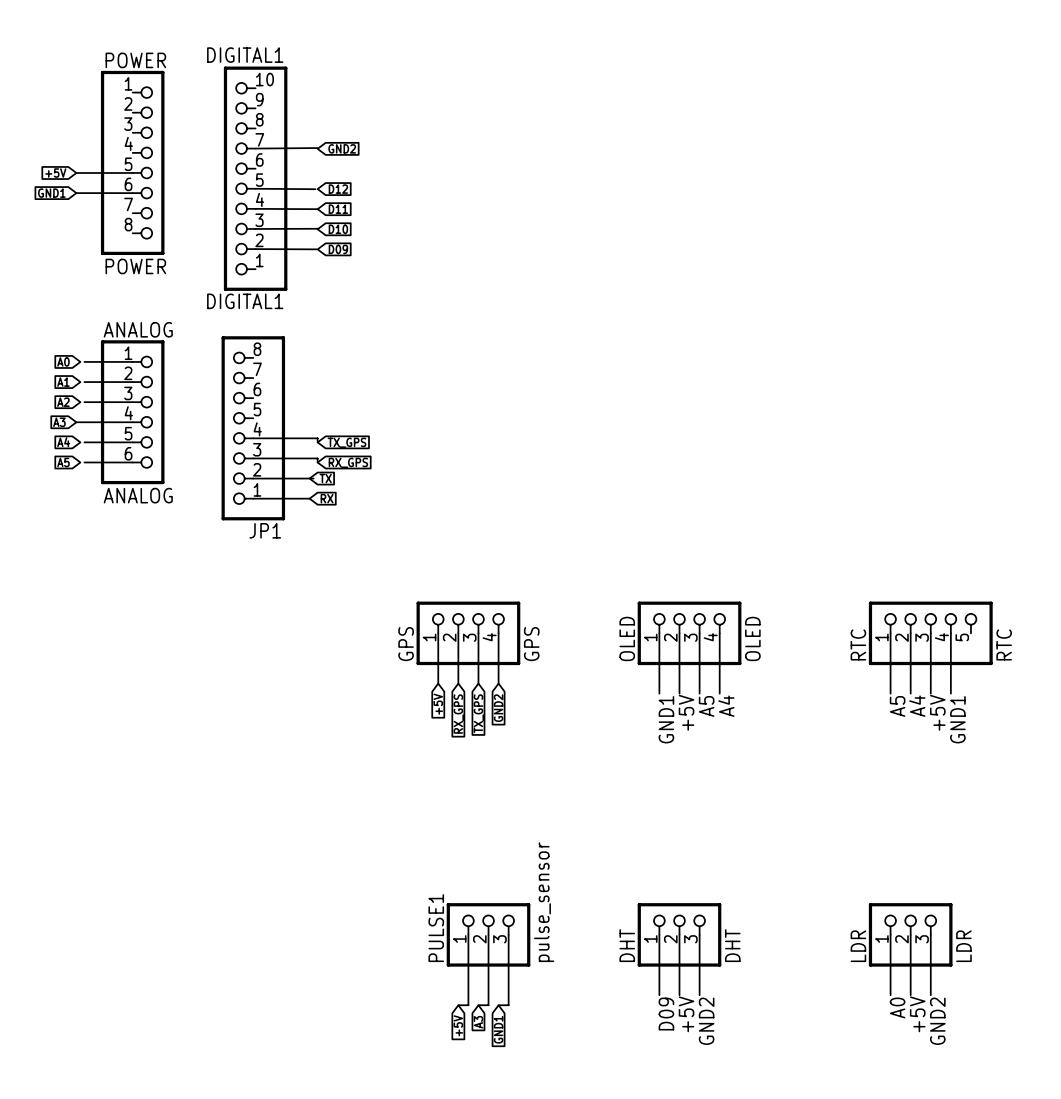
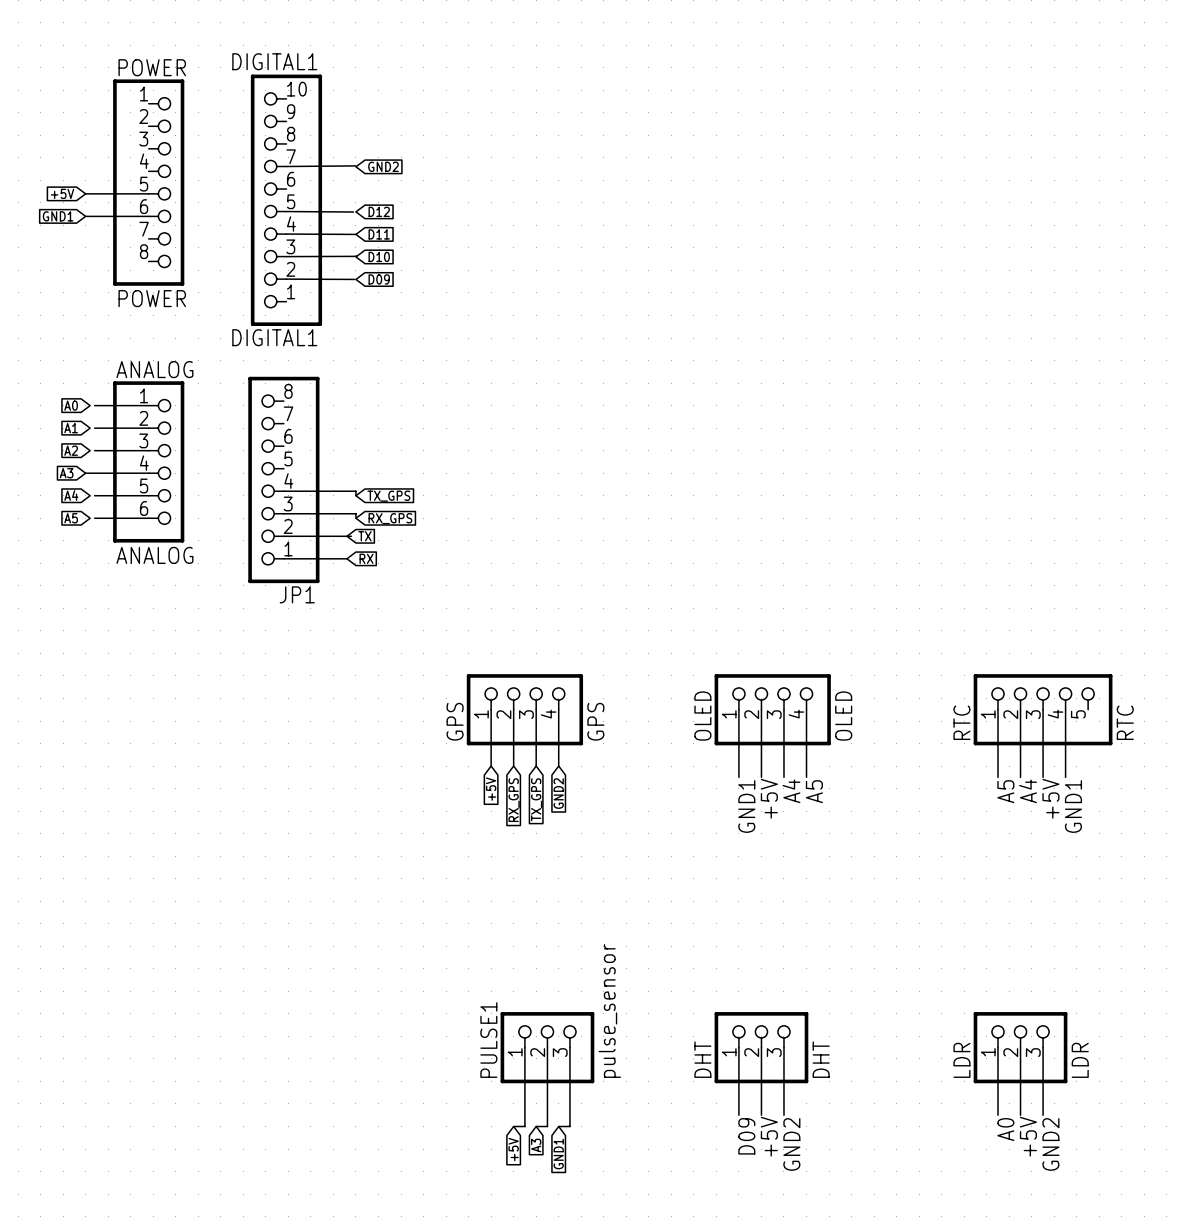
label: A5 (706, 706) -> A4 (791, 791)
label: A4 (726, 706) -> A5 (814, 791)

